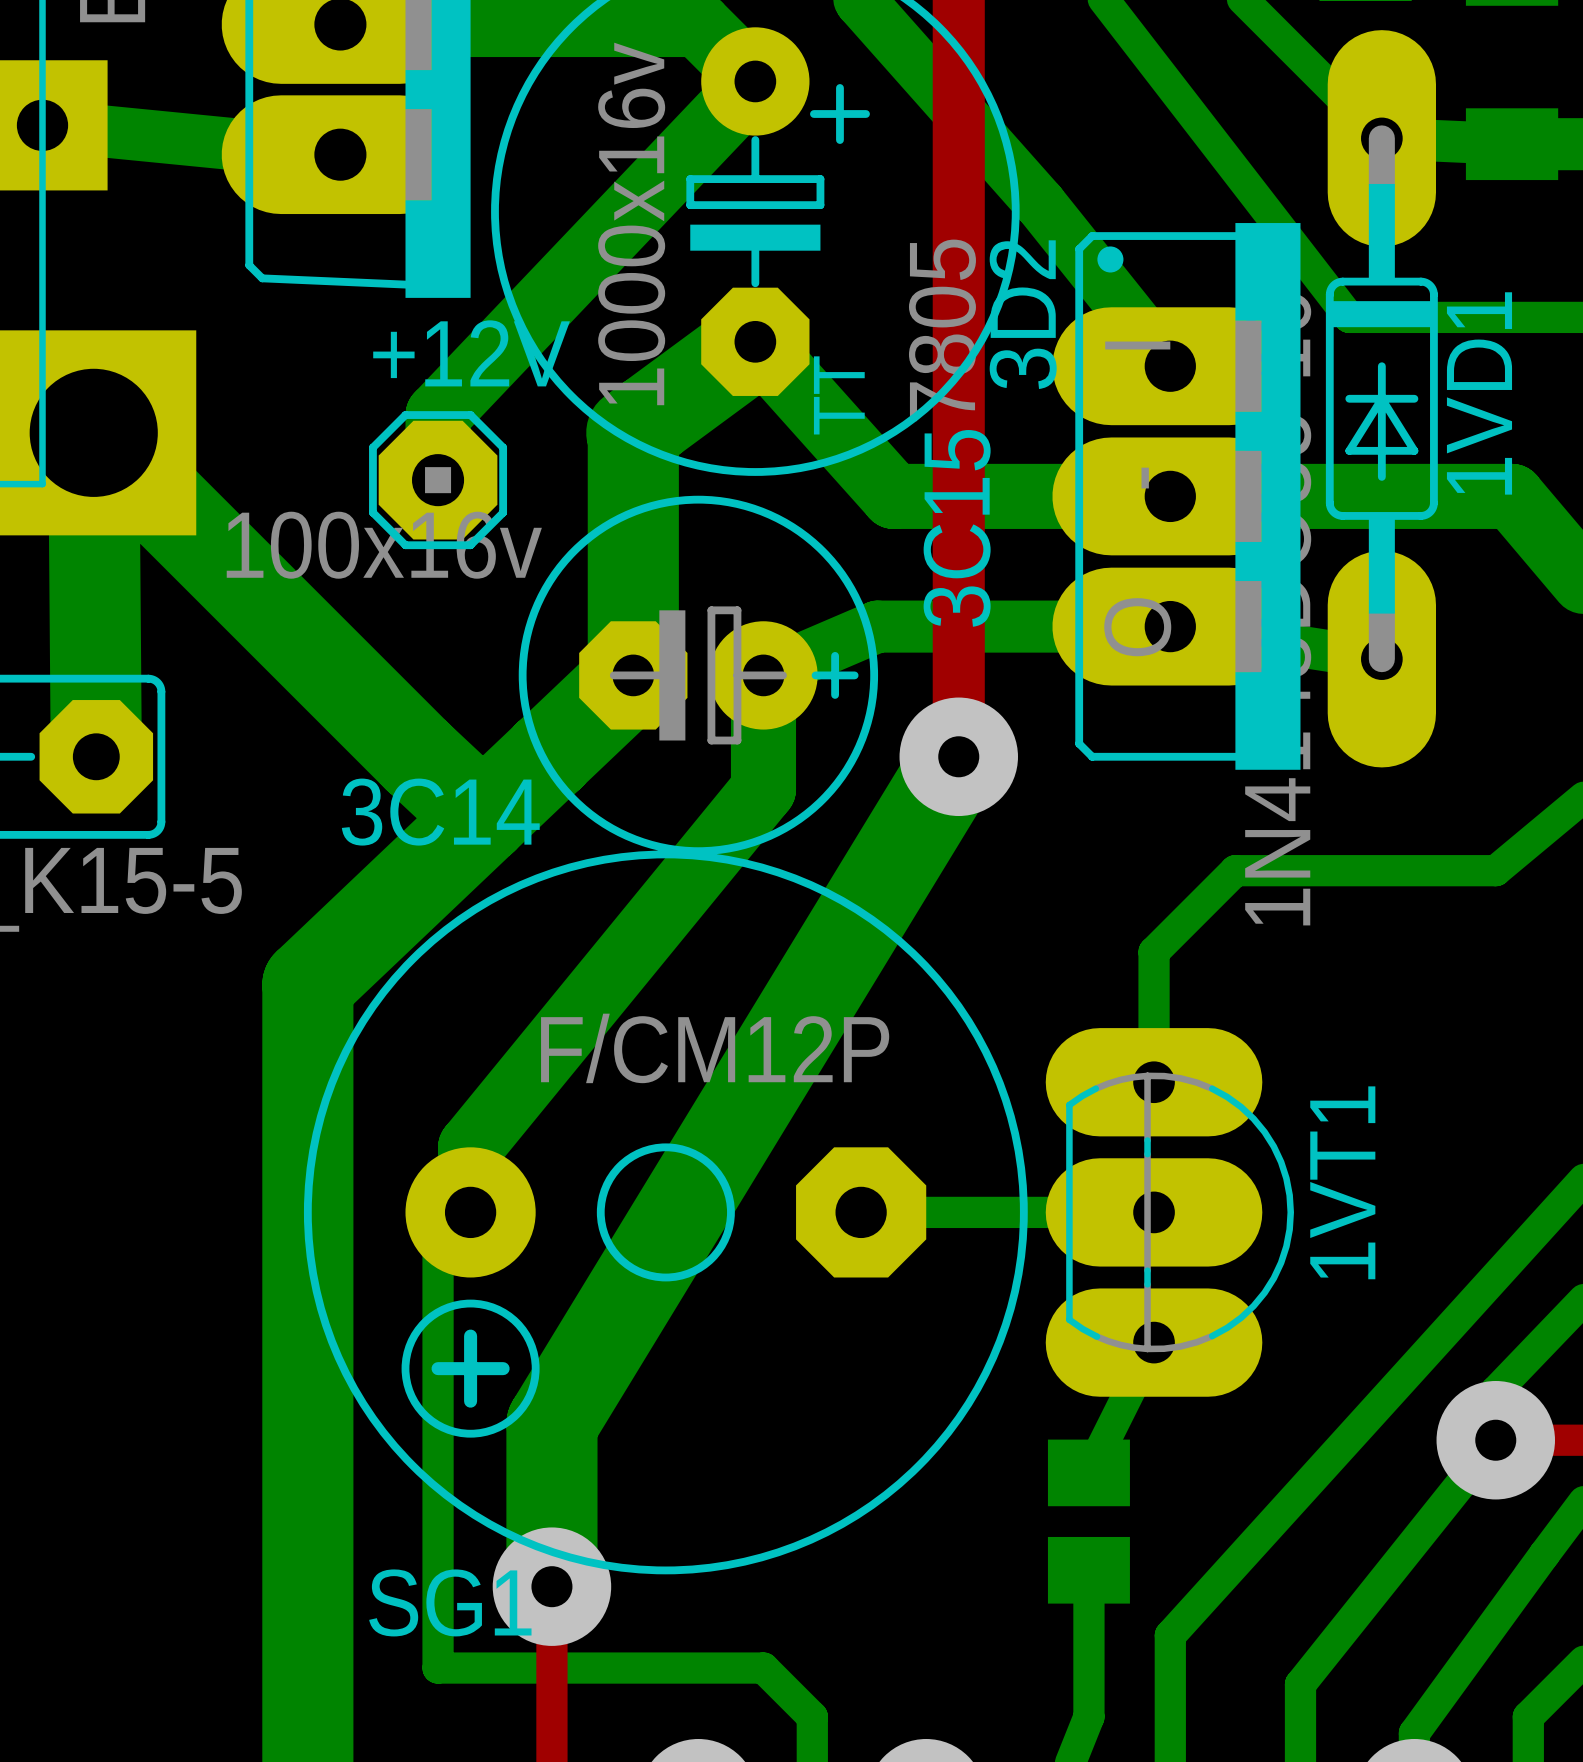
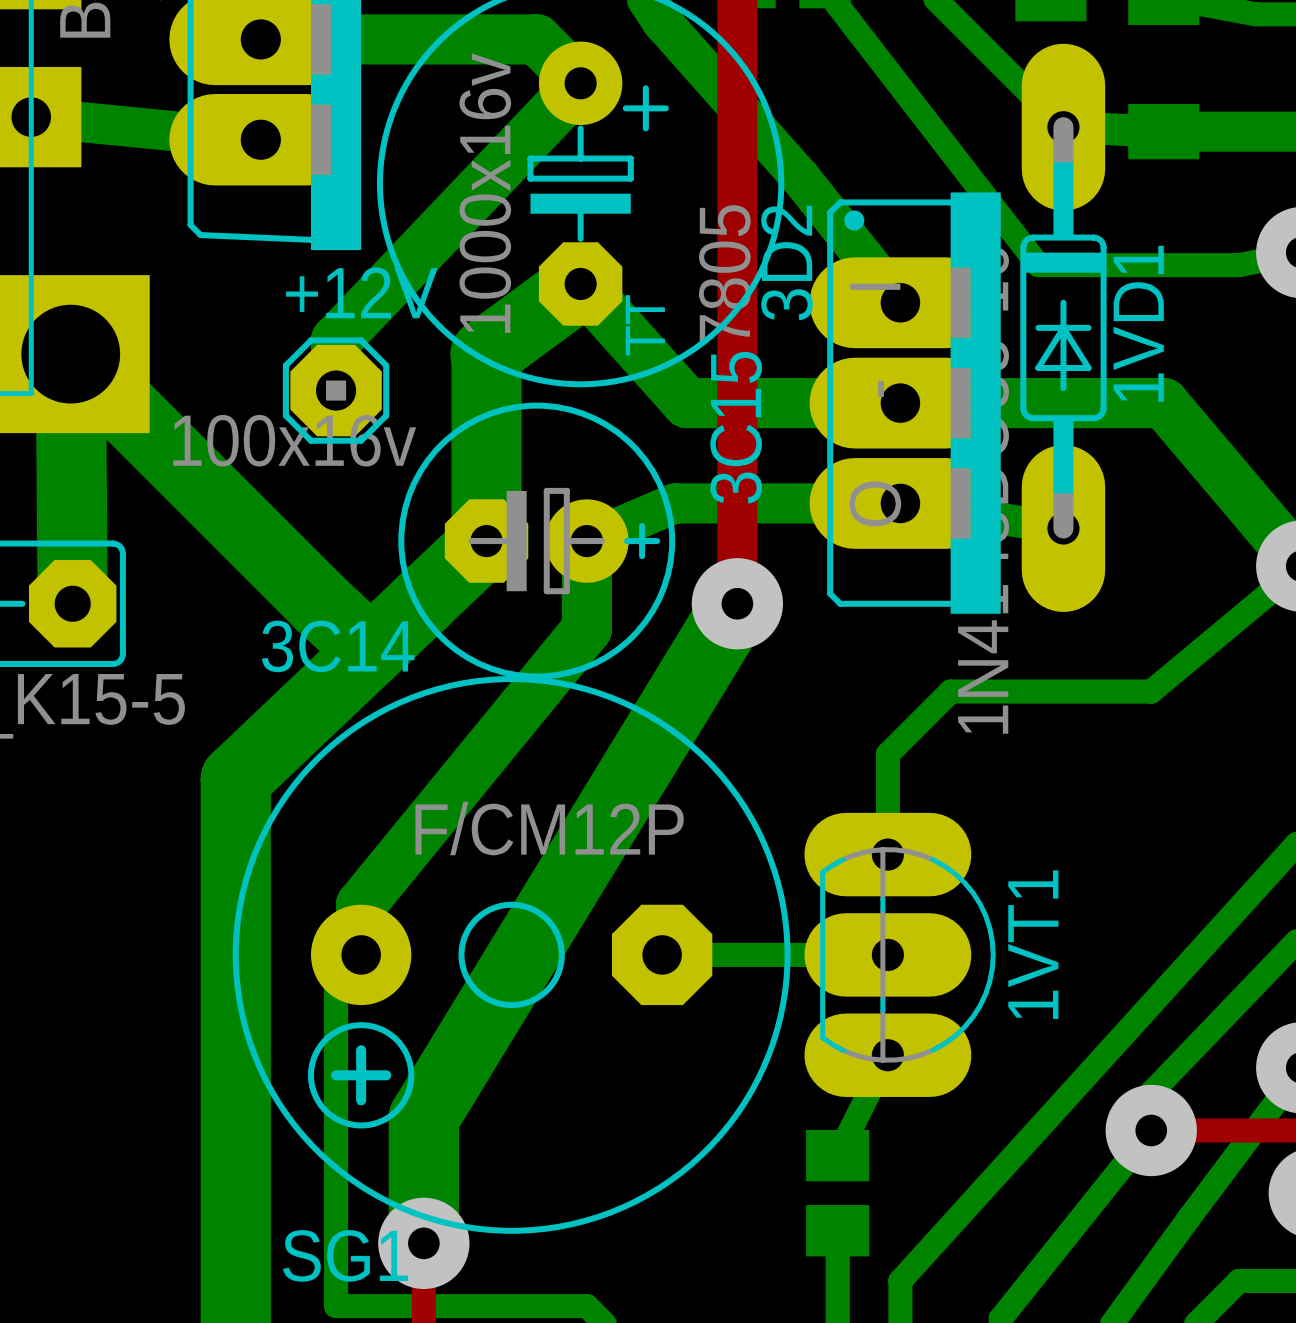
1VT1 name position: 1VT1 (1342, 1182) -> 1VT1 (1033, 944)

